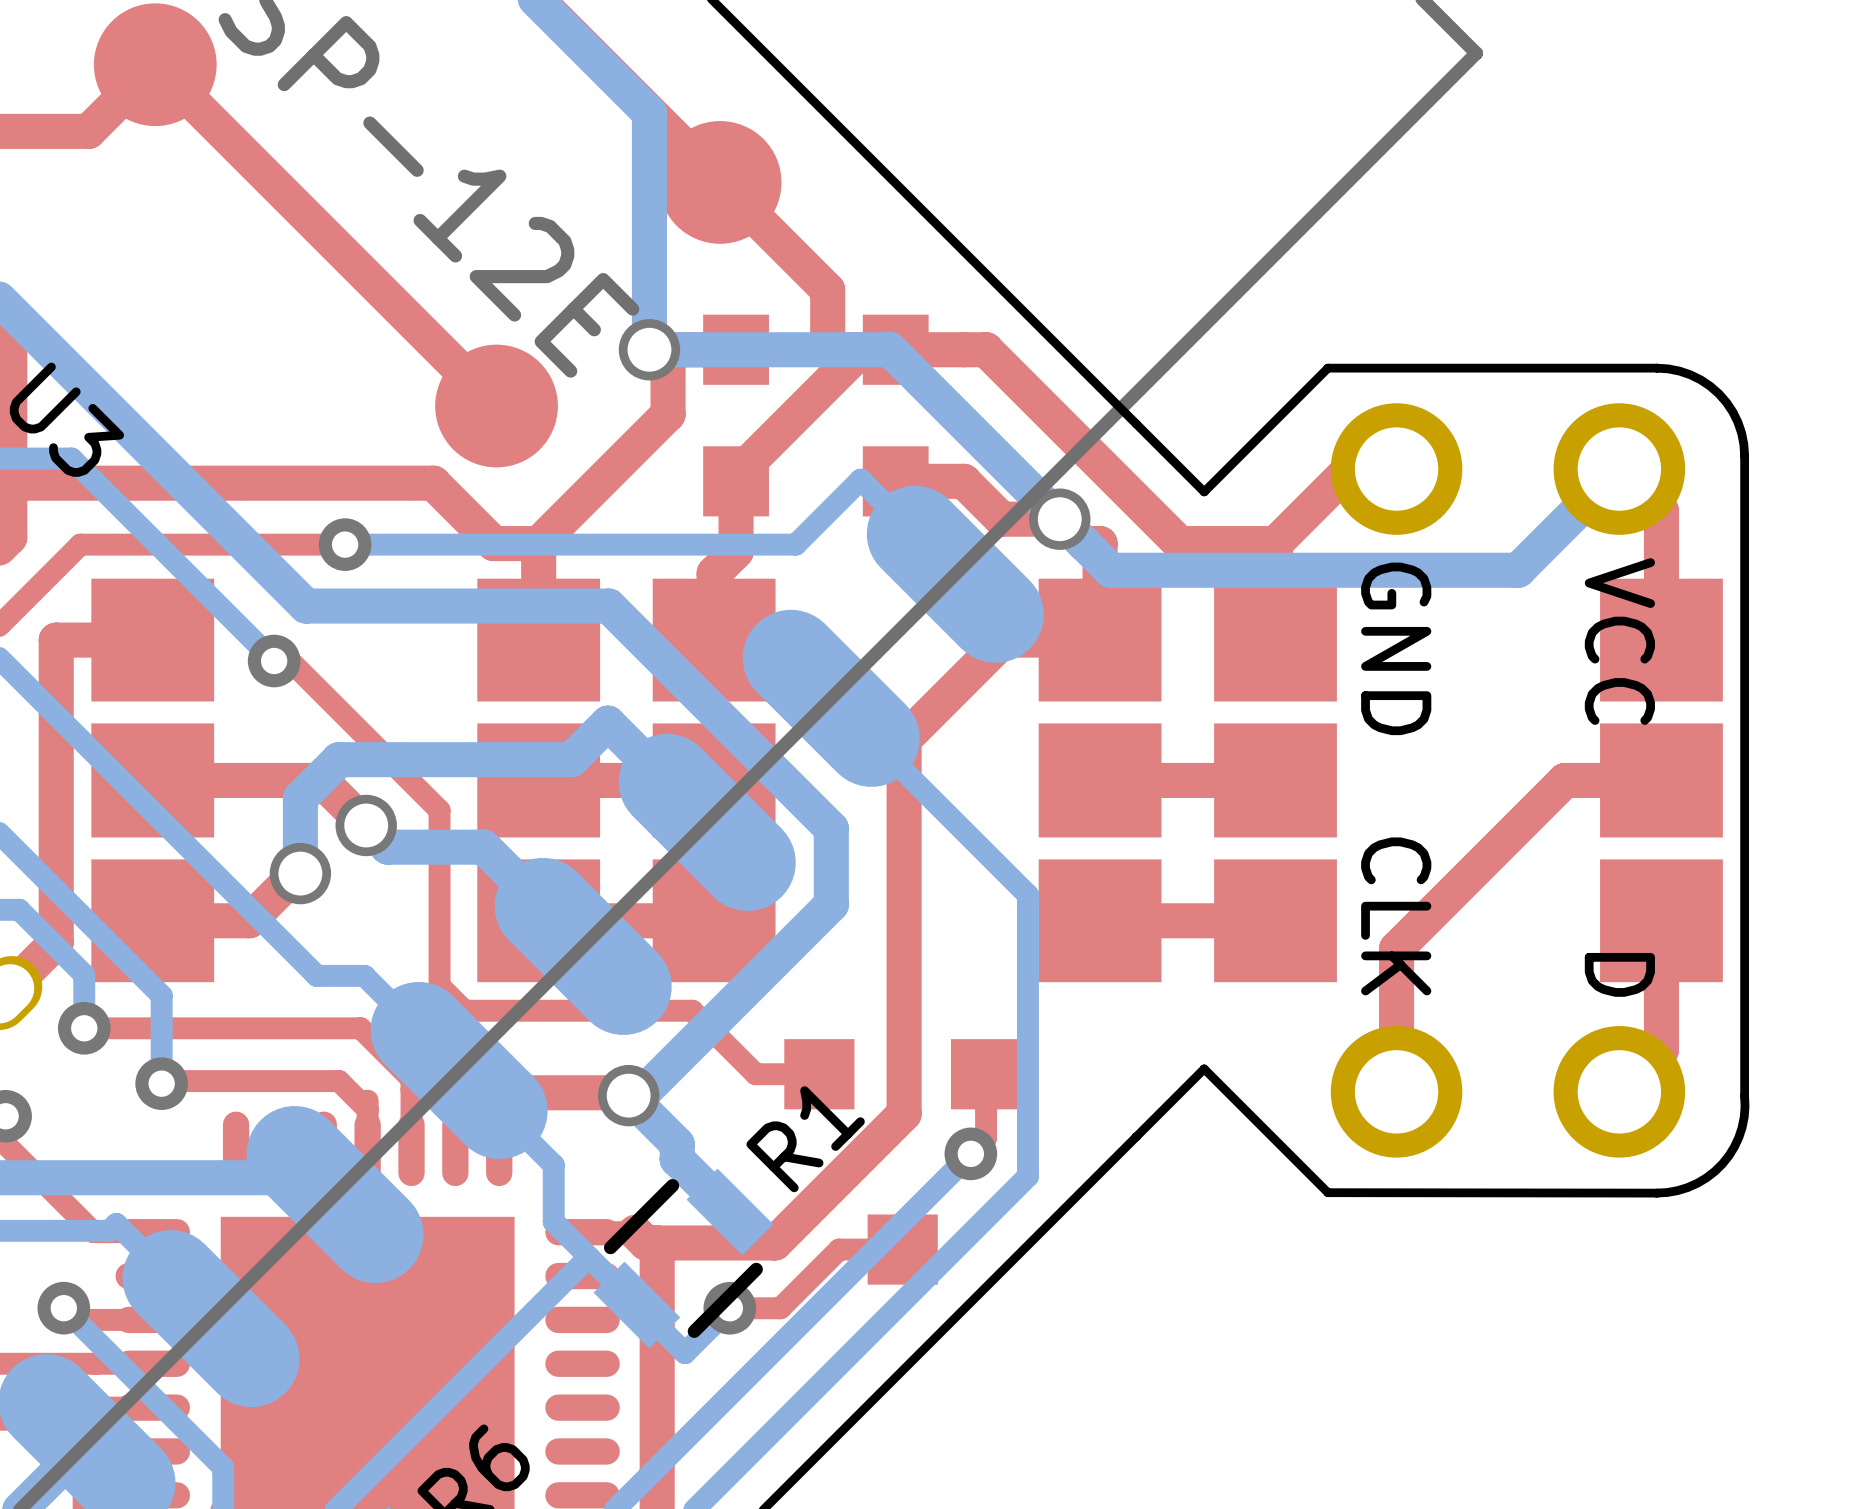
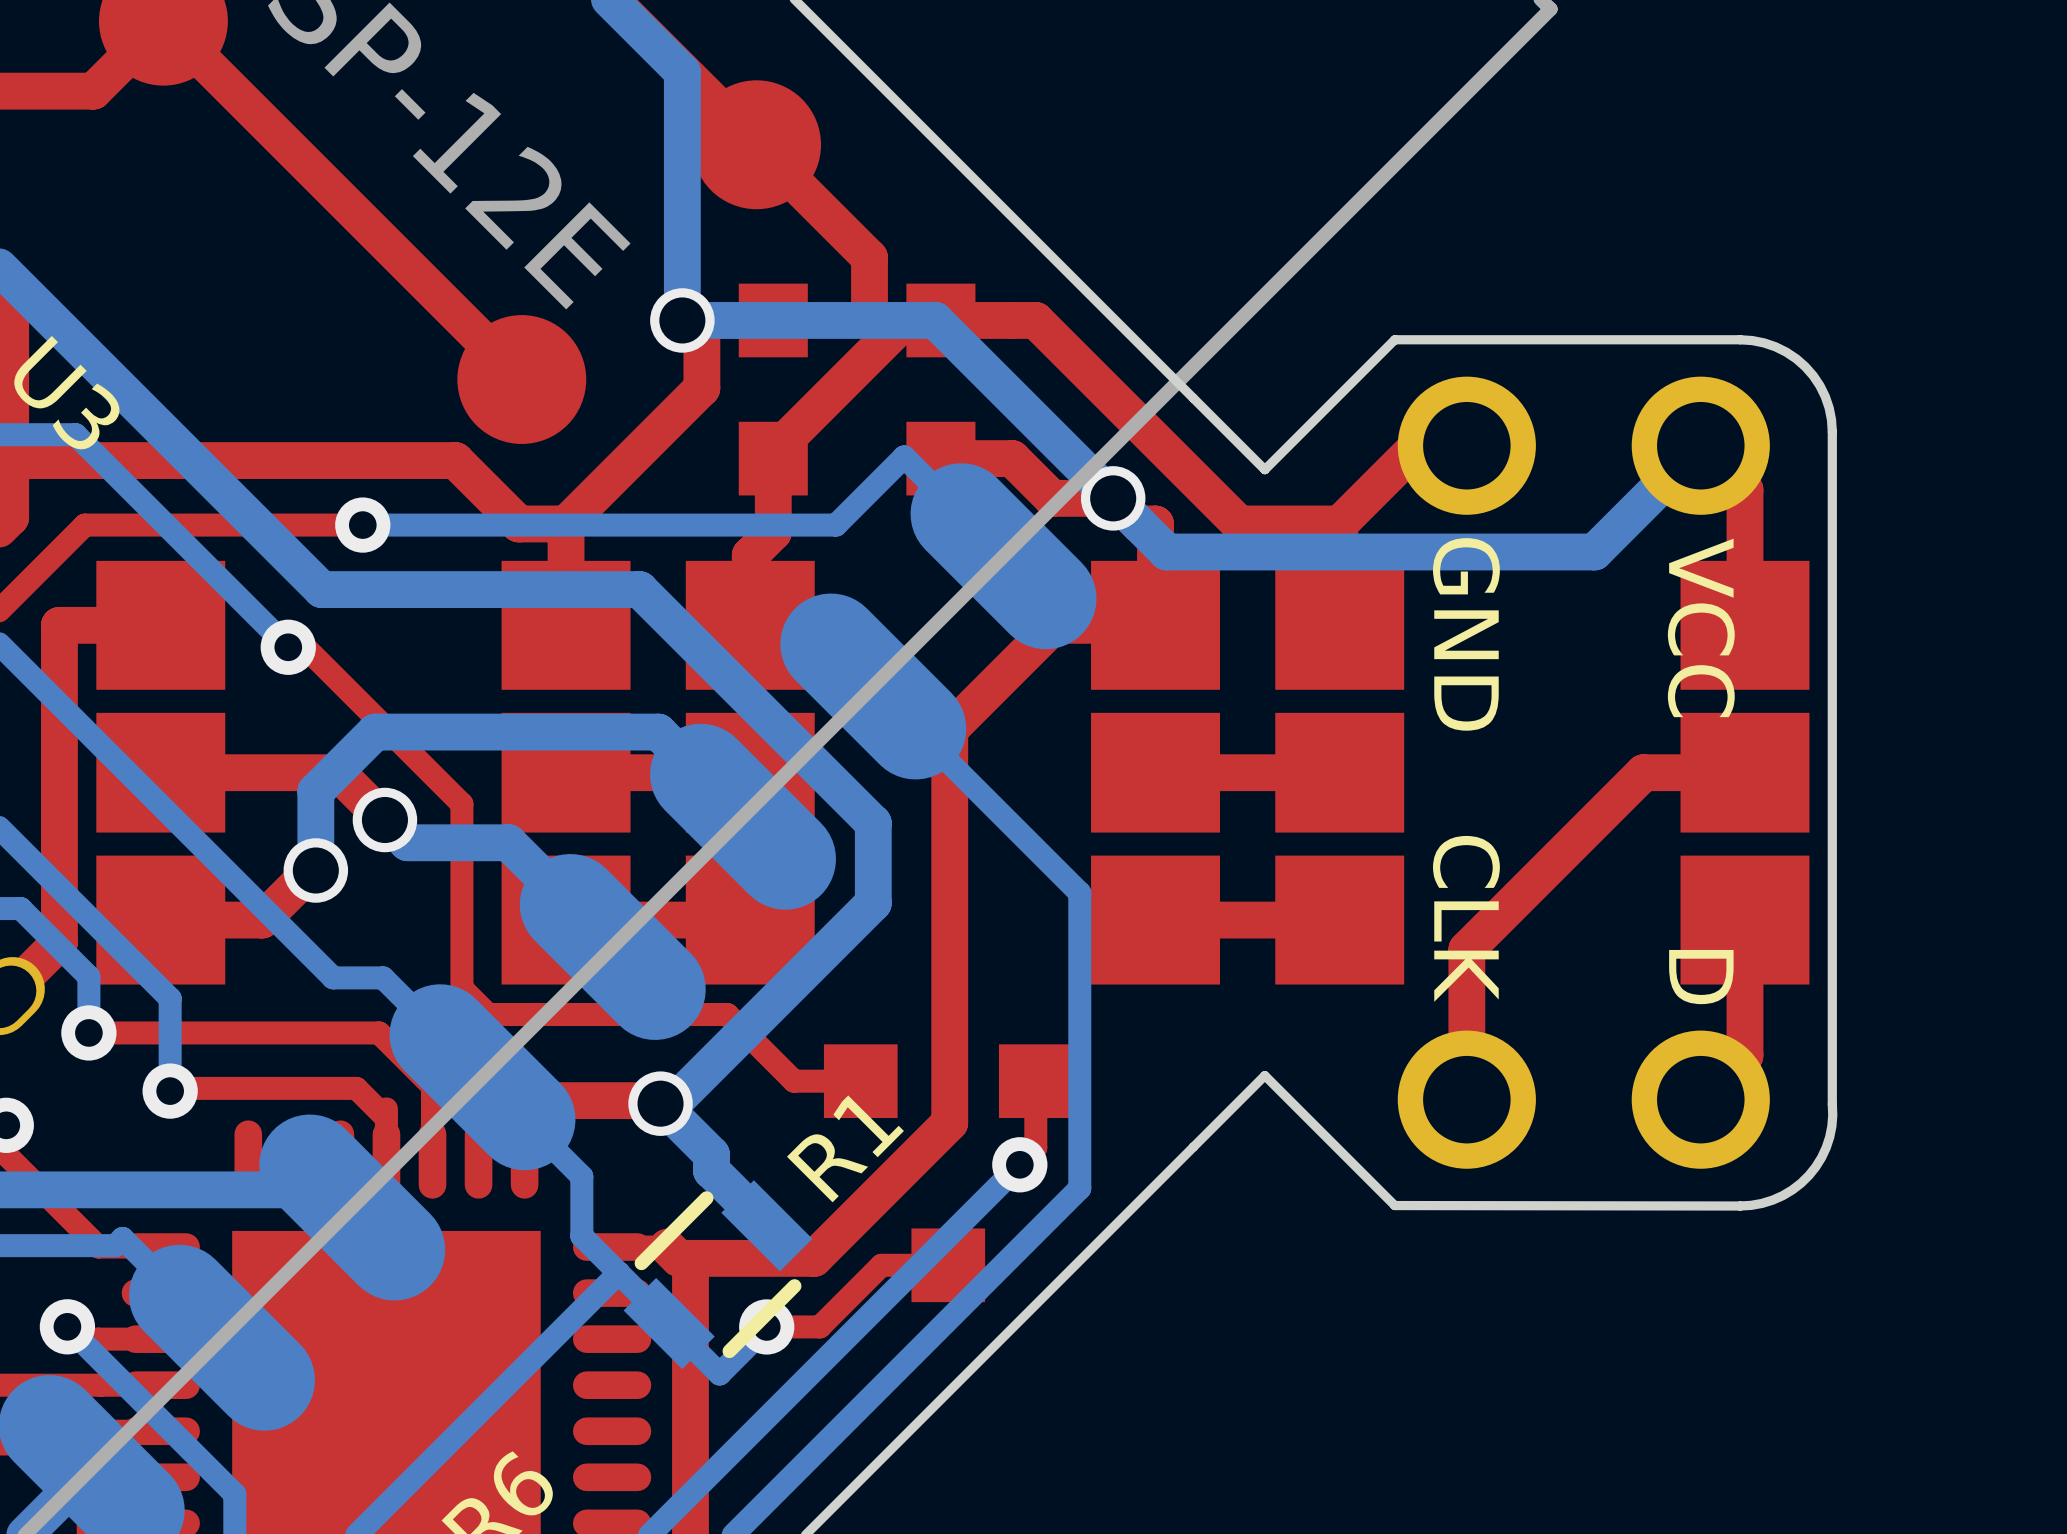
bottom track: (626, 741) (607, 723) (571, 759) (338, 759) -> (658, 732) (375, 732) (356, 750)

